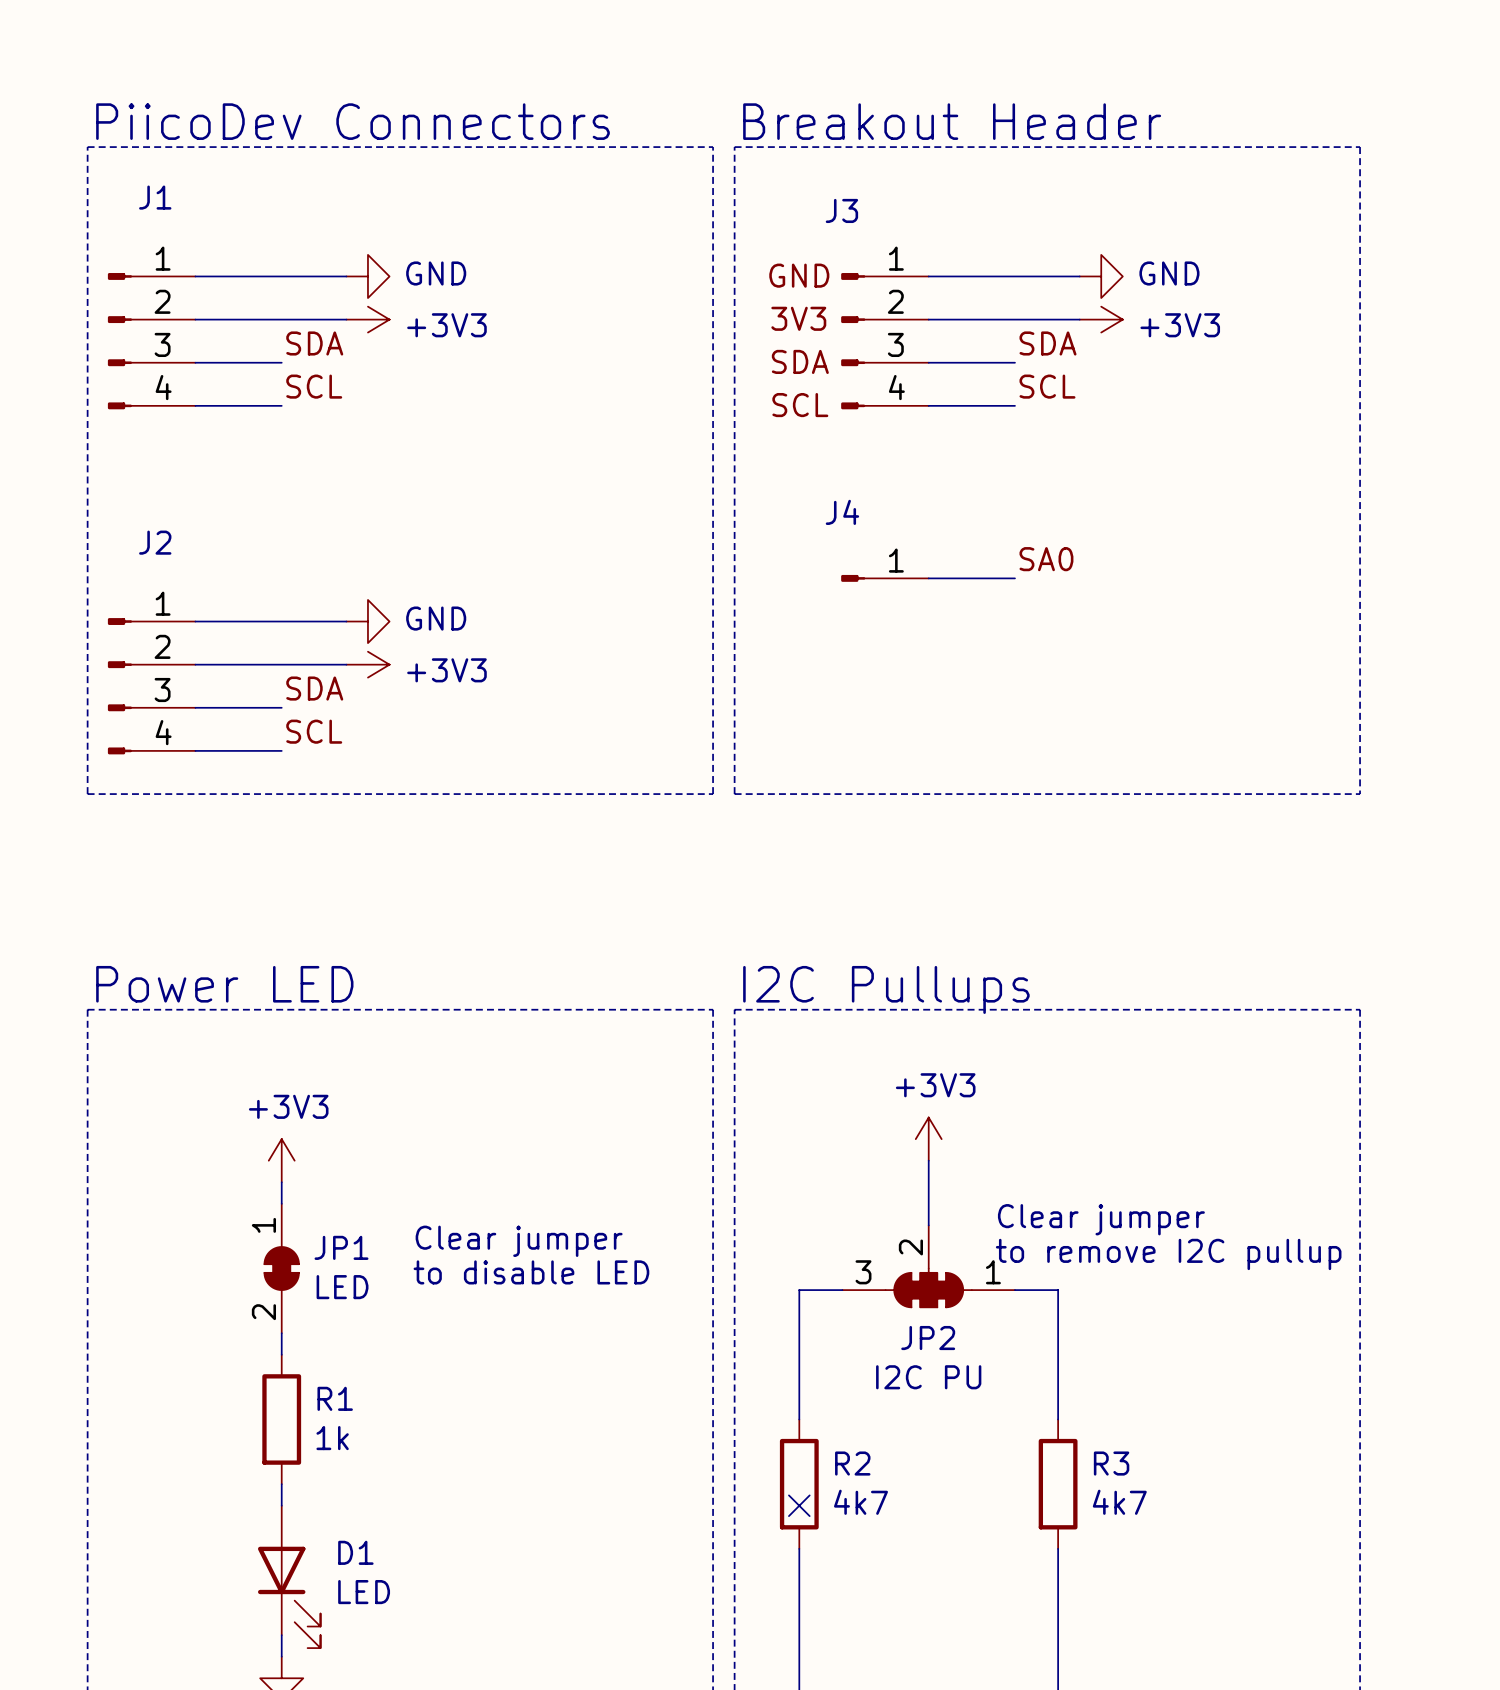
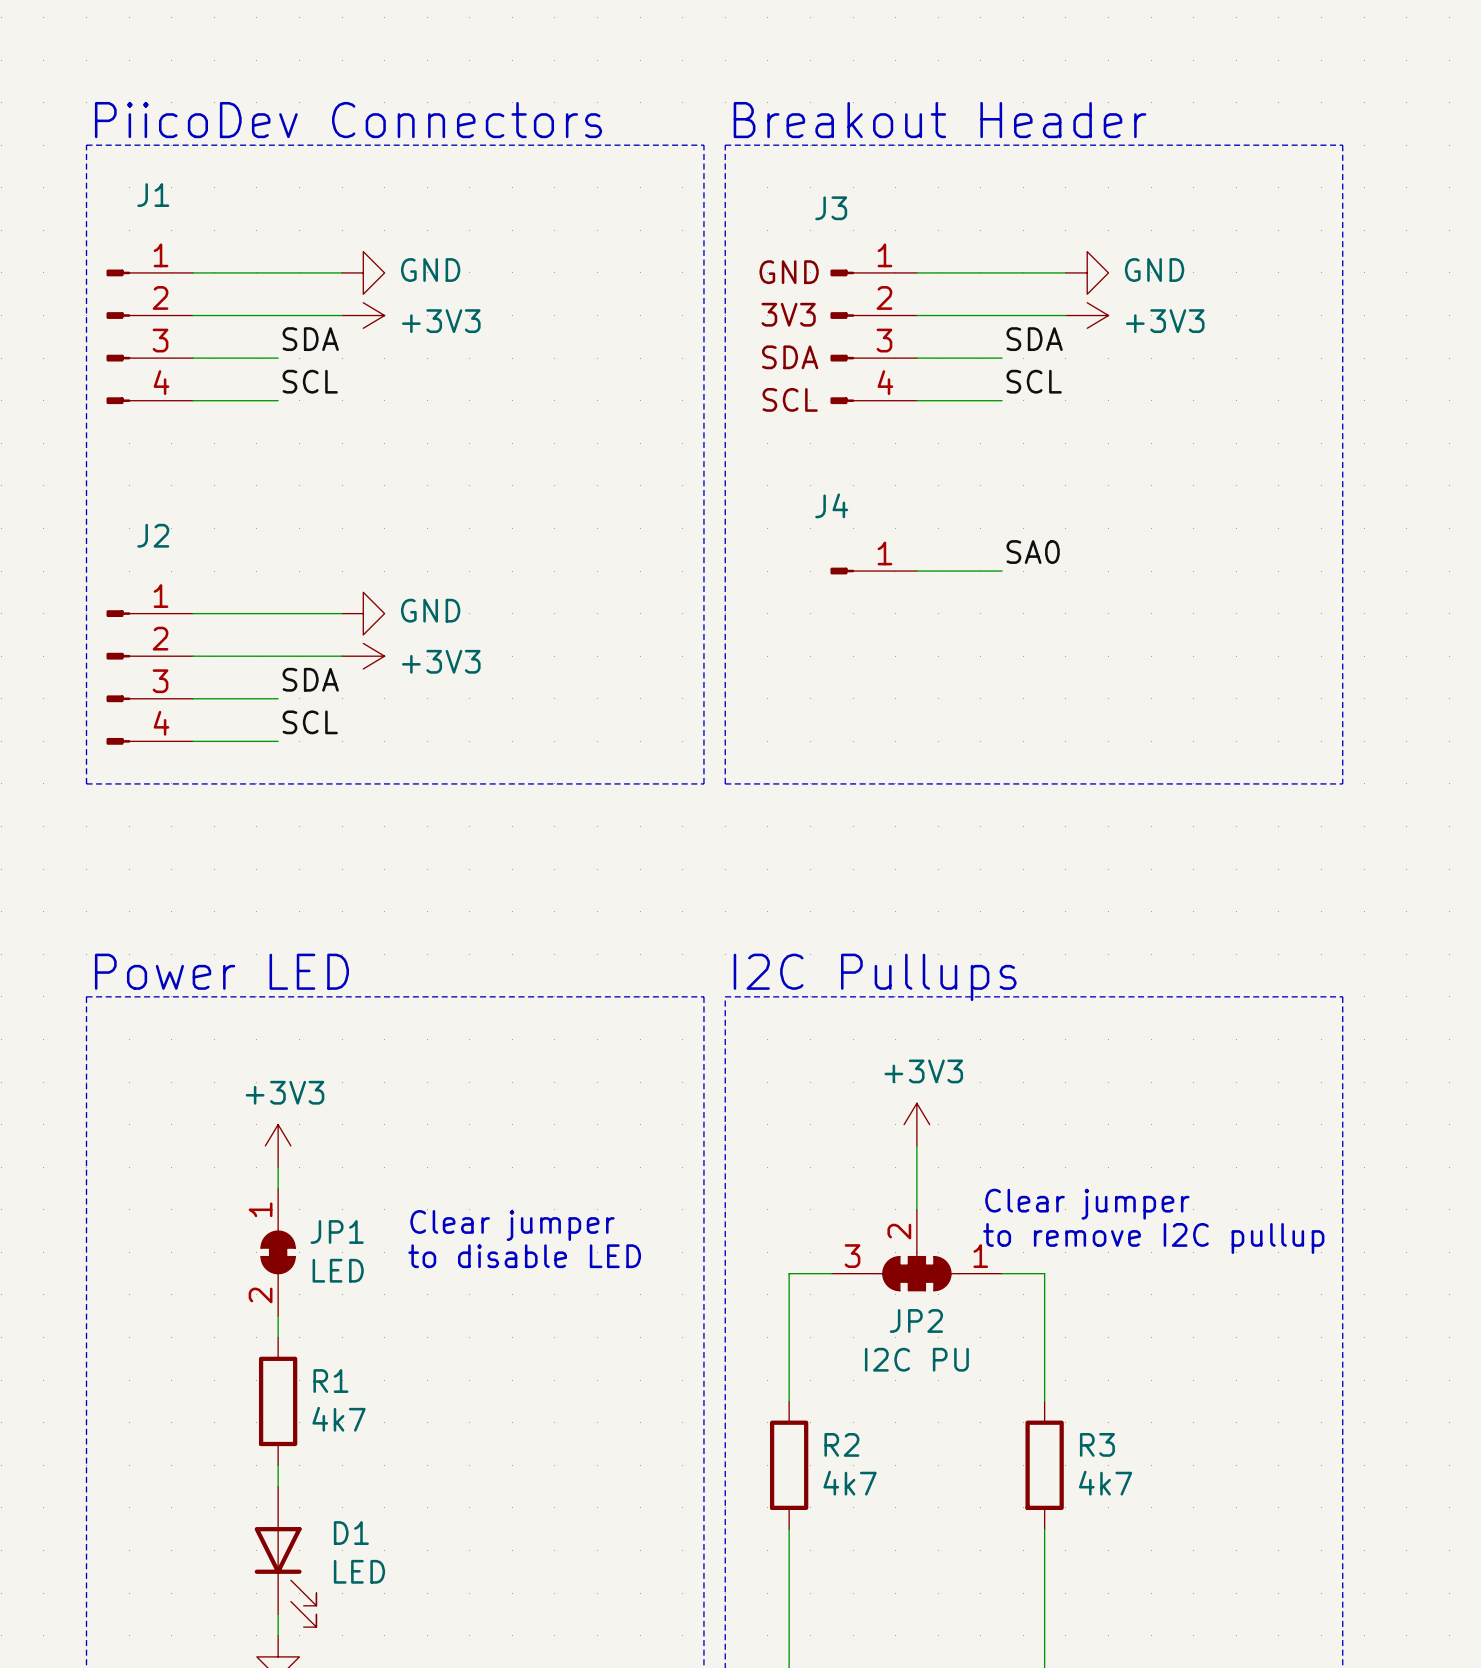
R1 value: 1k (332, 1438) -> 4k7 (339, 1419)
no-connect mark: (799, 1505) -> none

